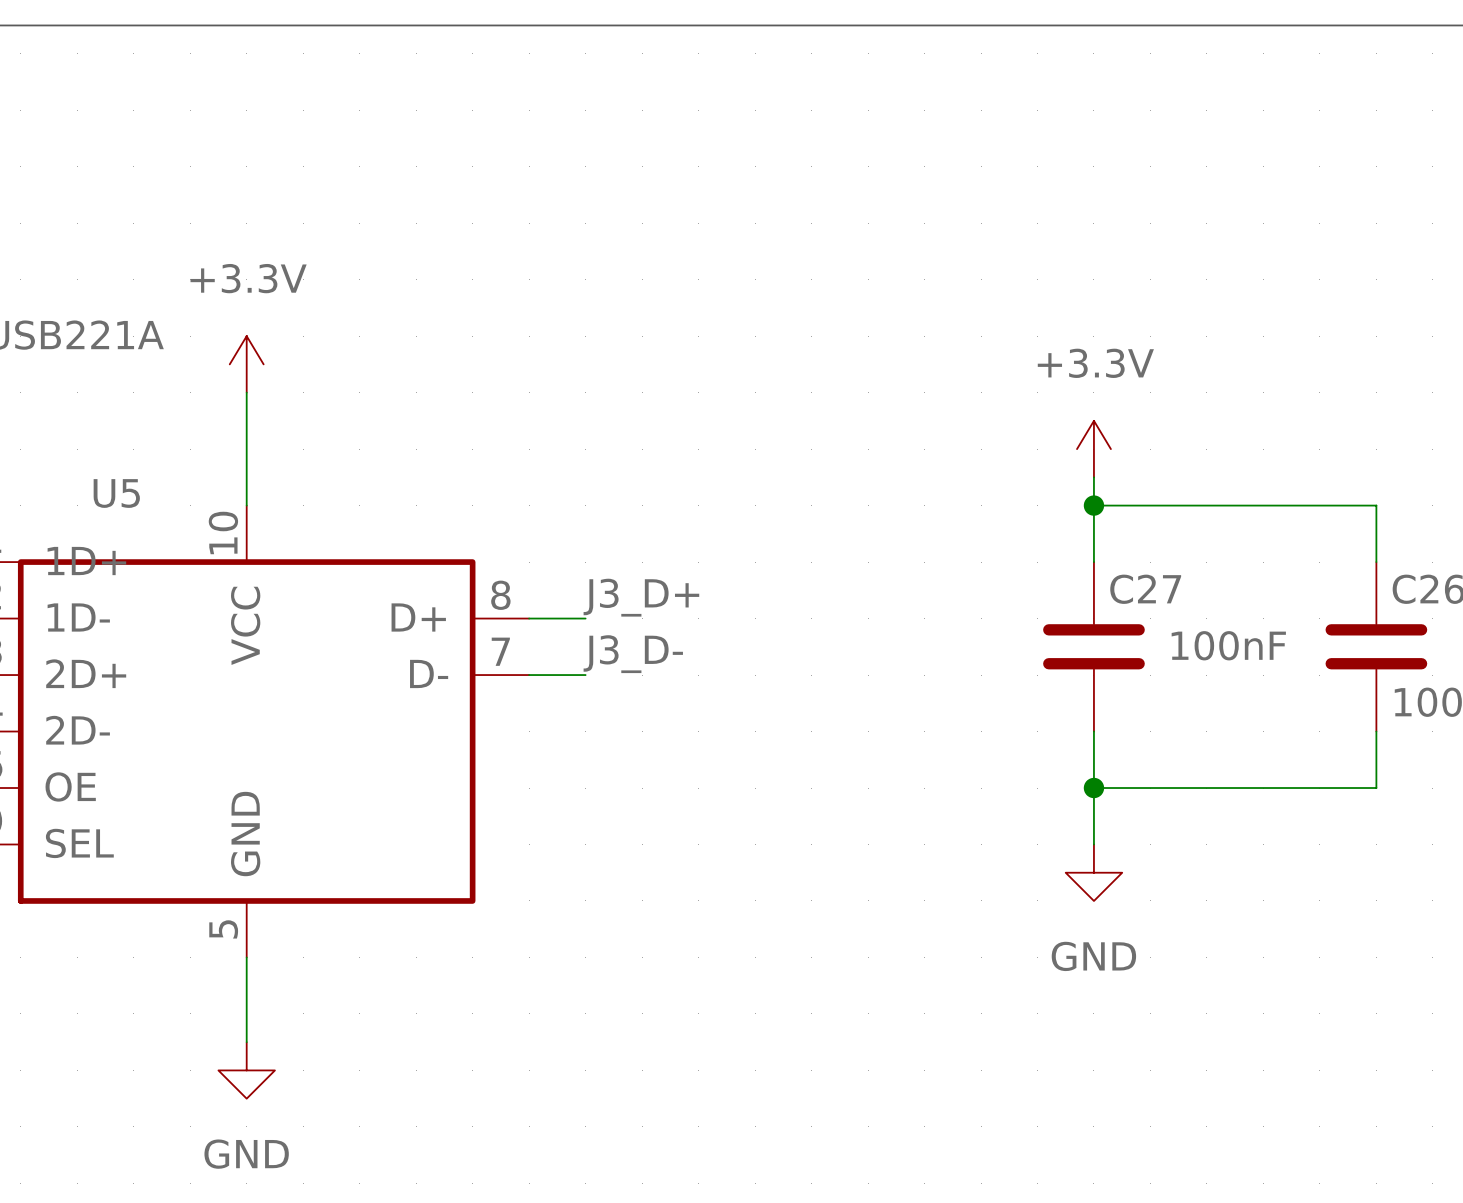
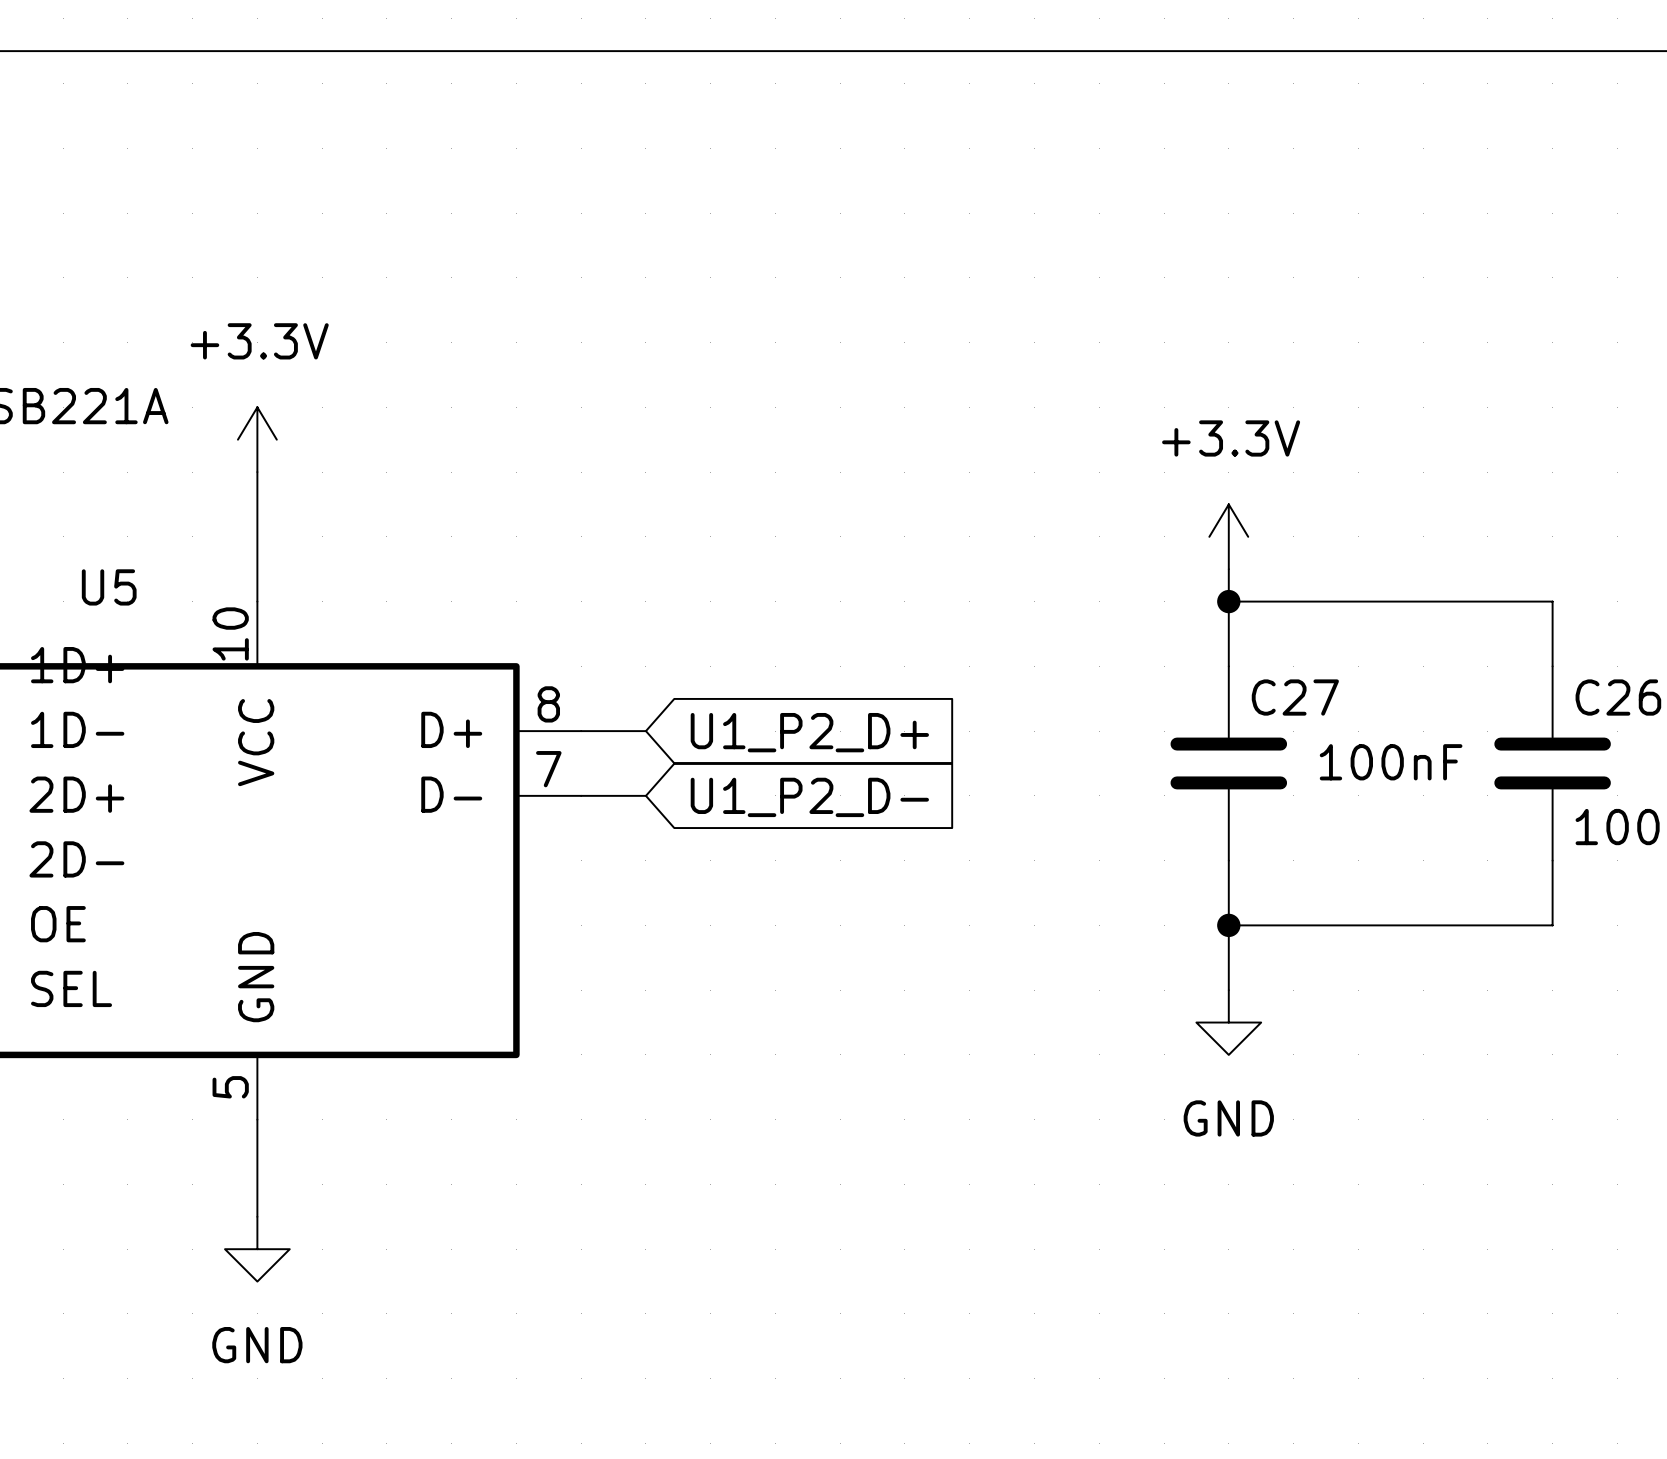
label: J3_D+ (641, 597) -> none
global label: none -> U1_P2_D+ (809, 732)
label: J3_D- (633, 654) -> none
global label: none -> U1_P2_D- (809, 797)

